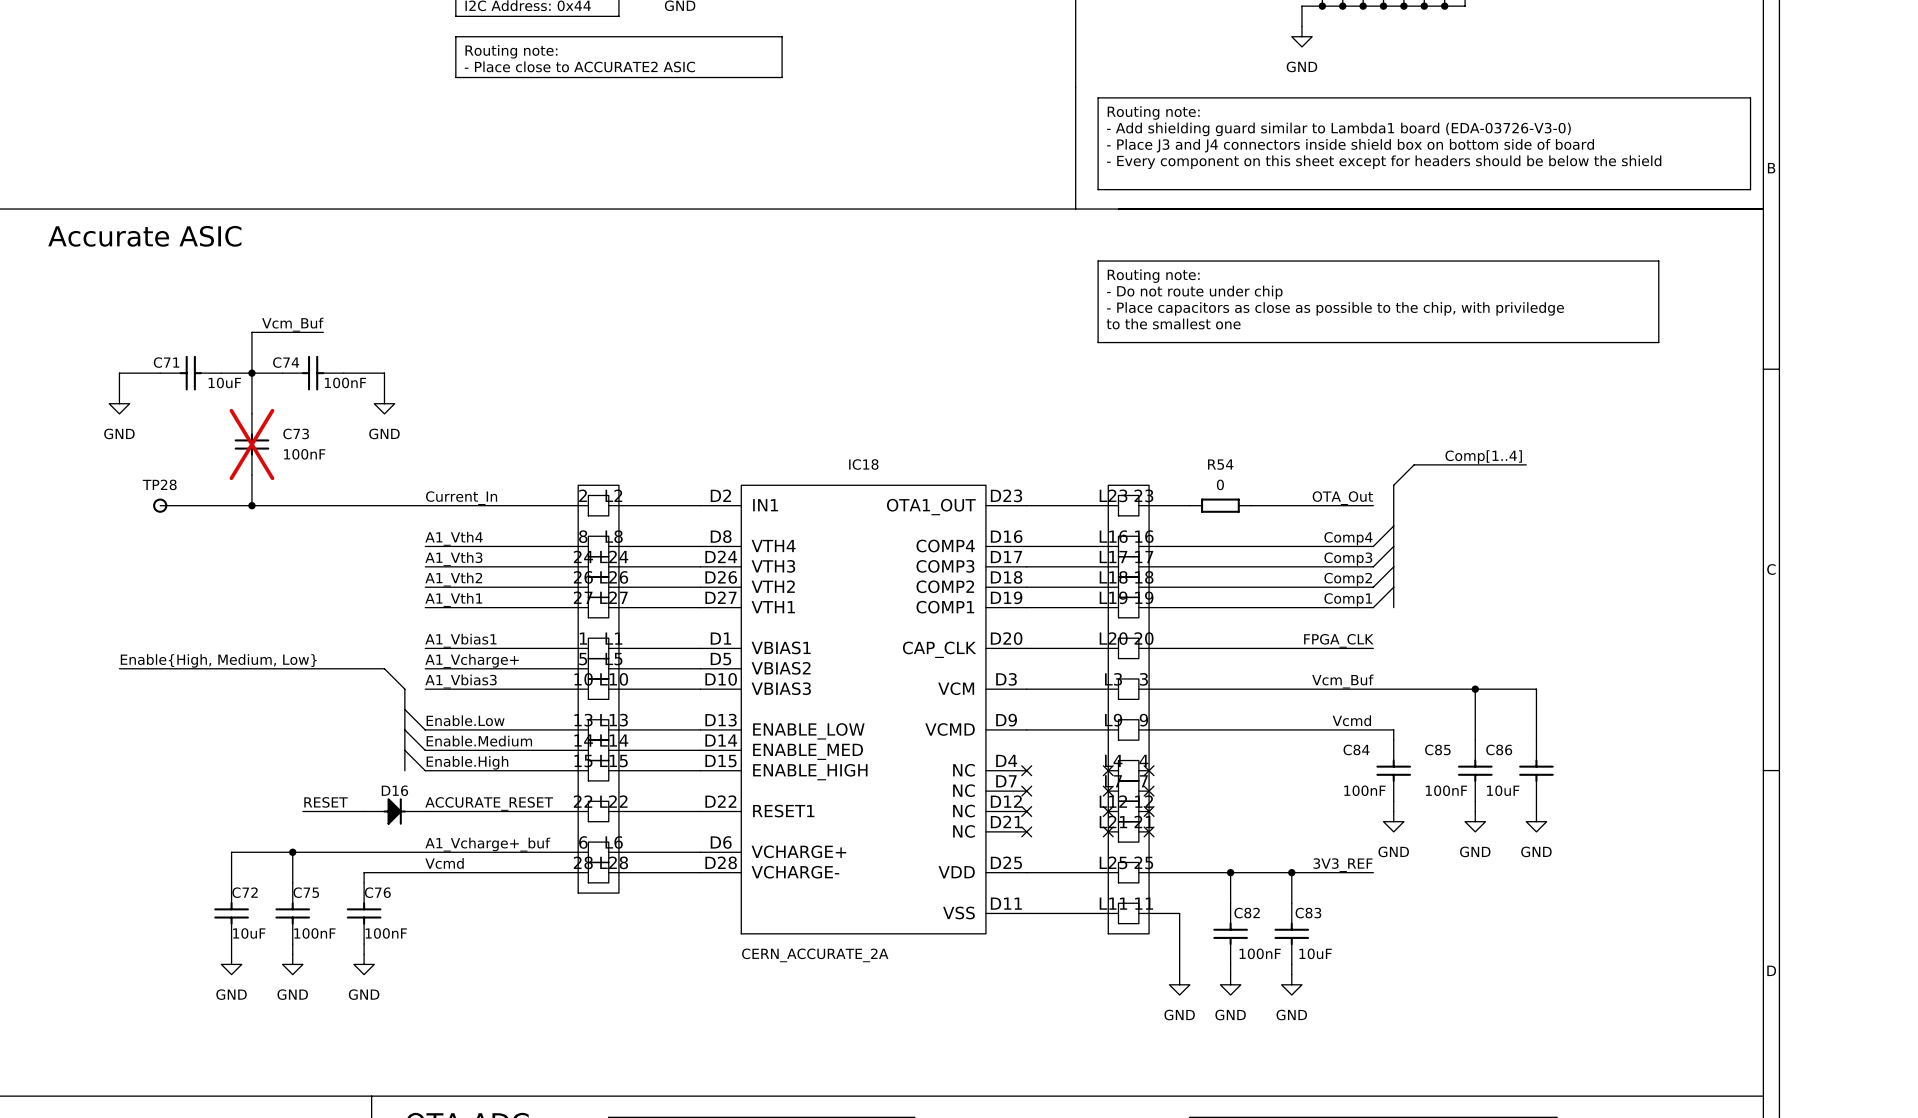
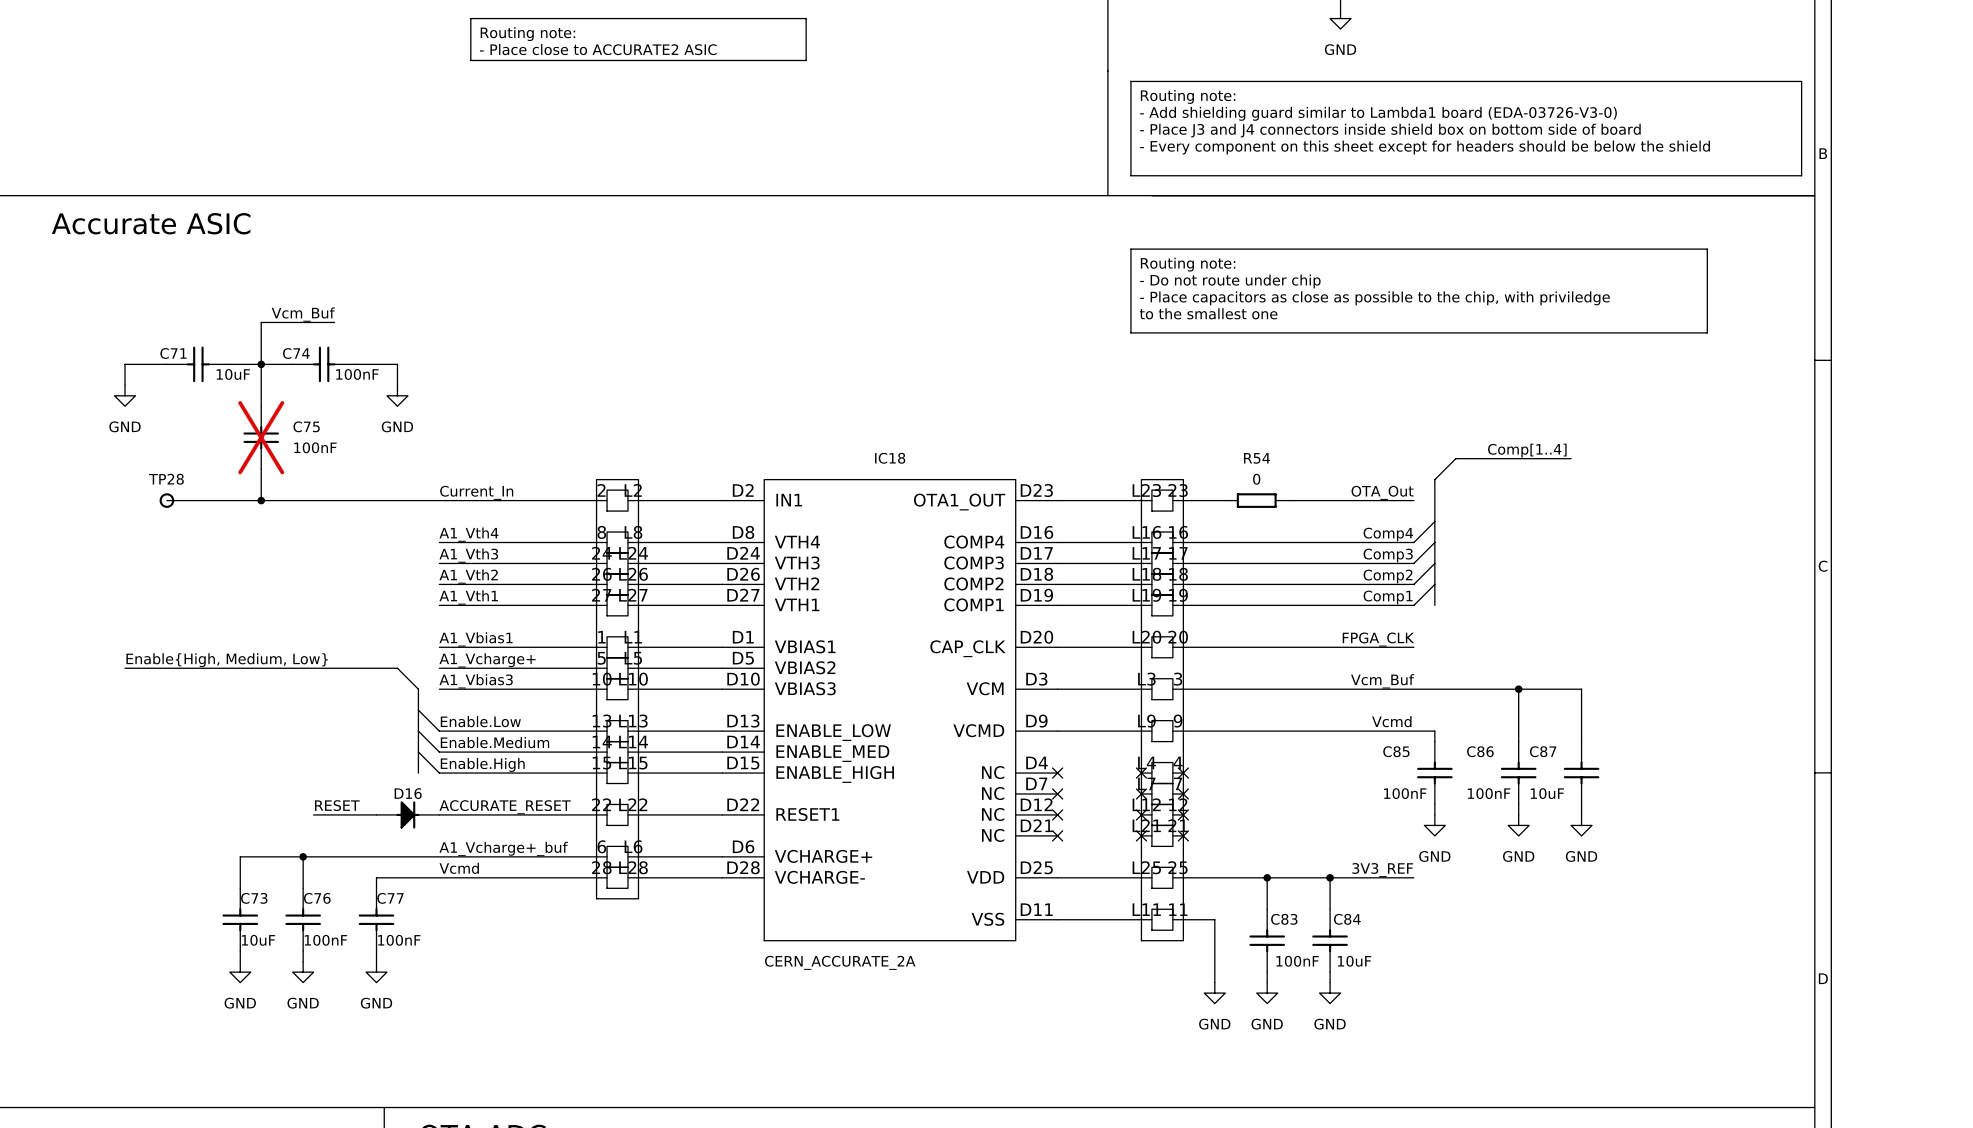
C73 name: C73 (296, 433) -> C75 (306, 426)
C84 name: C84 (1356, 749) -> C85 (1396, 751)
C85 name: C85 (1437, 749) -> C86 (1480, 751)
C86 name: C86 (1499, 749) -> C87 (1543, 751)
C72 name: C72 (245, 892) -> C73 (254, 898)
C75 name: C75 (306, 892) -> C76 (317, 898)
C76 name: C76 (377, 892) -> C77 (390, 898)
C82 name: C82 (1247, 913) -> C83 (1284, 919)
C83 name: C83 (1308, 913) -> C84 (1347, 919)

